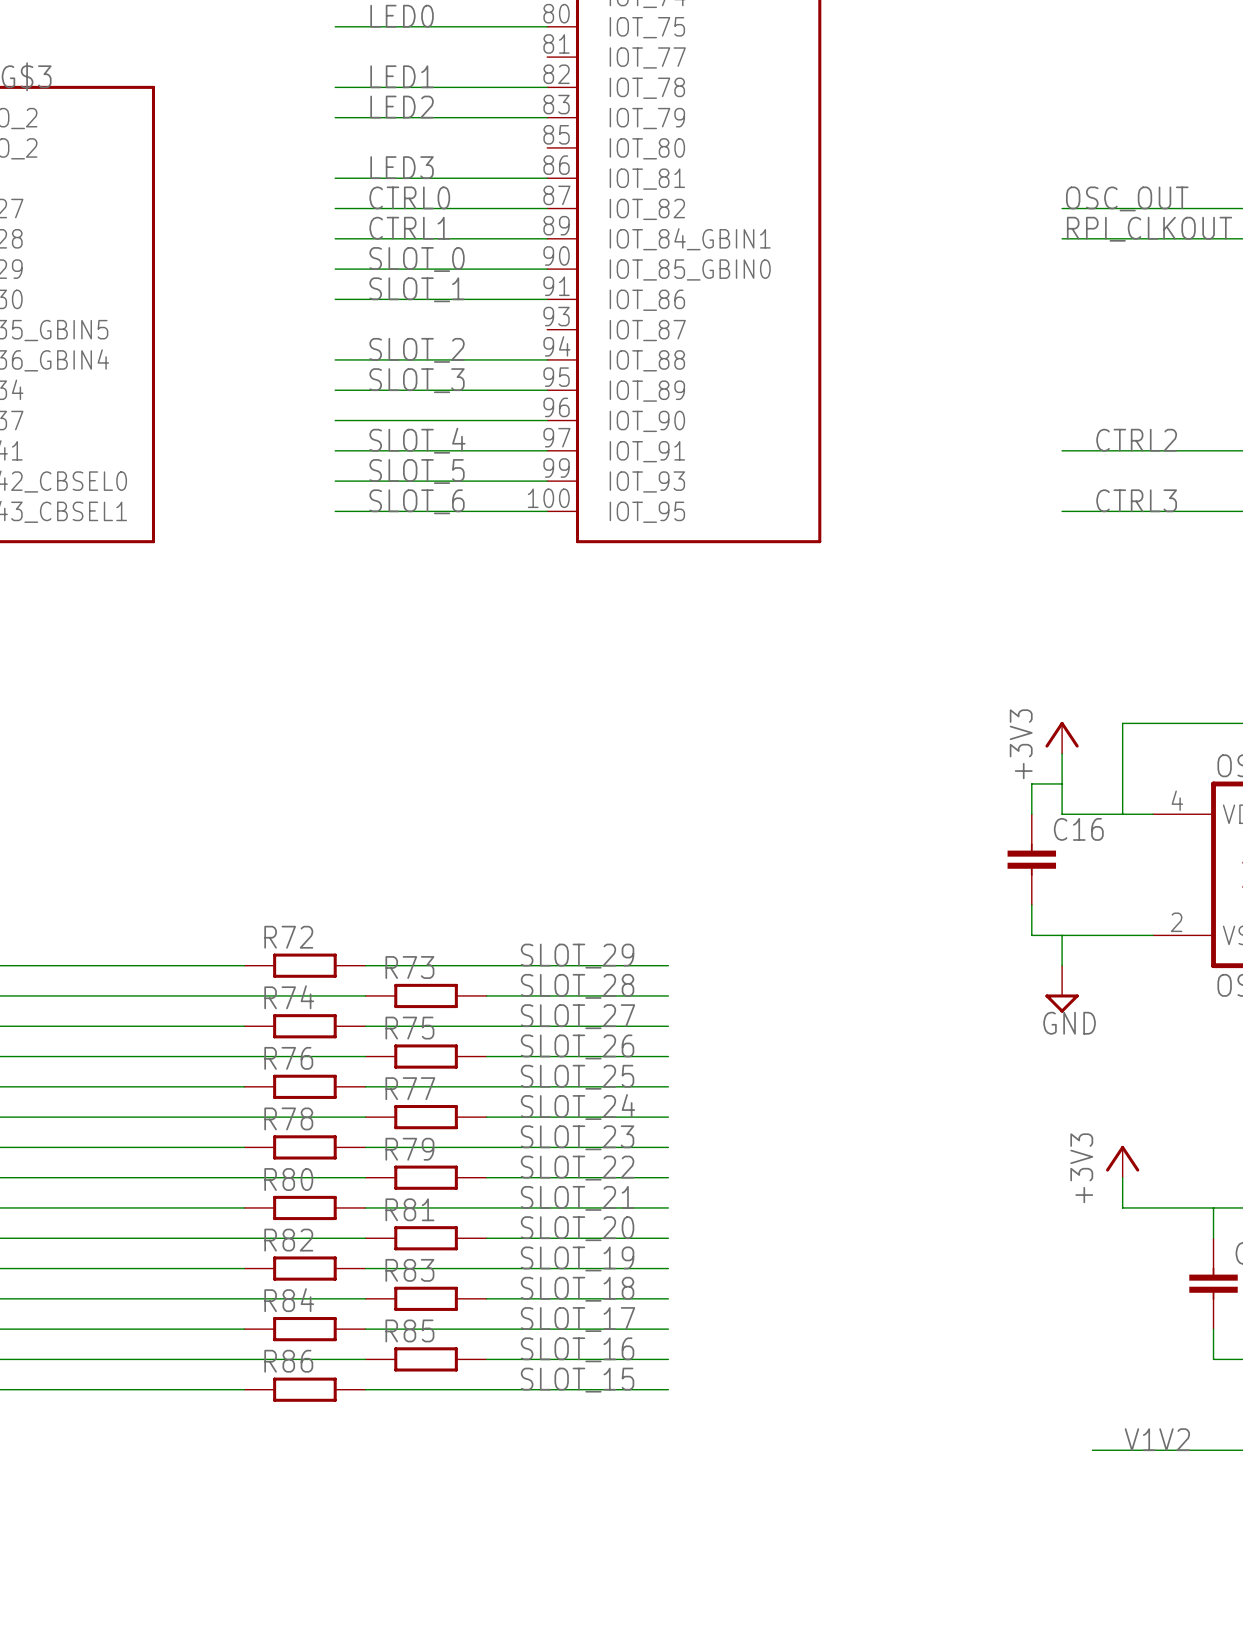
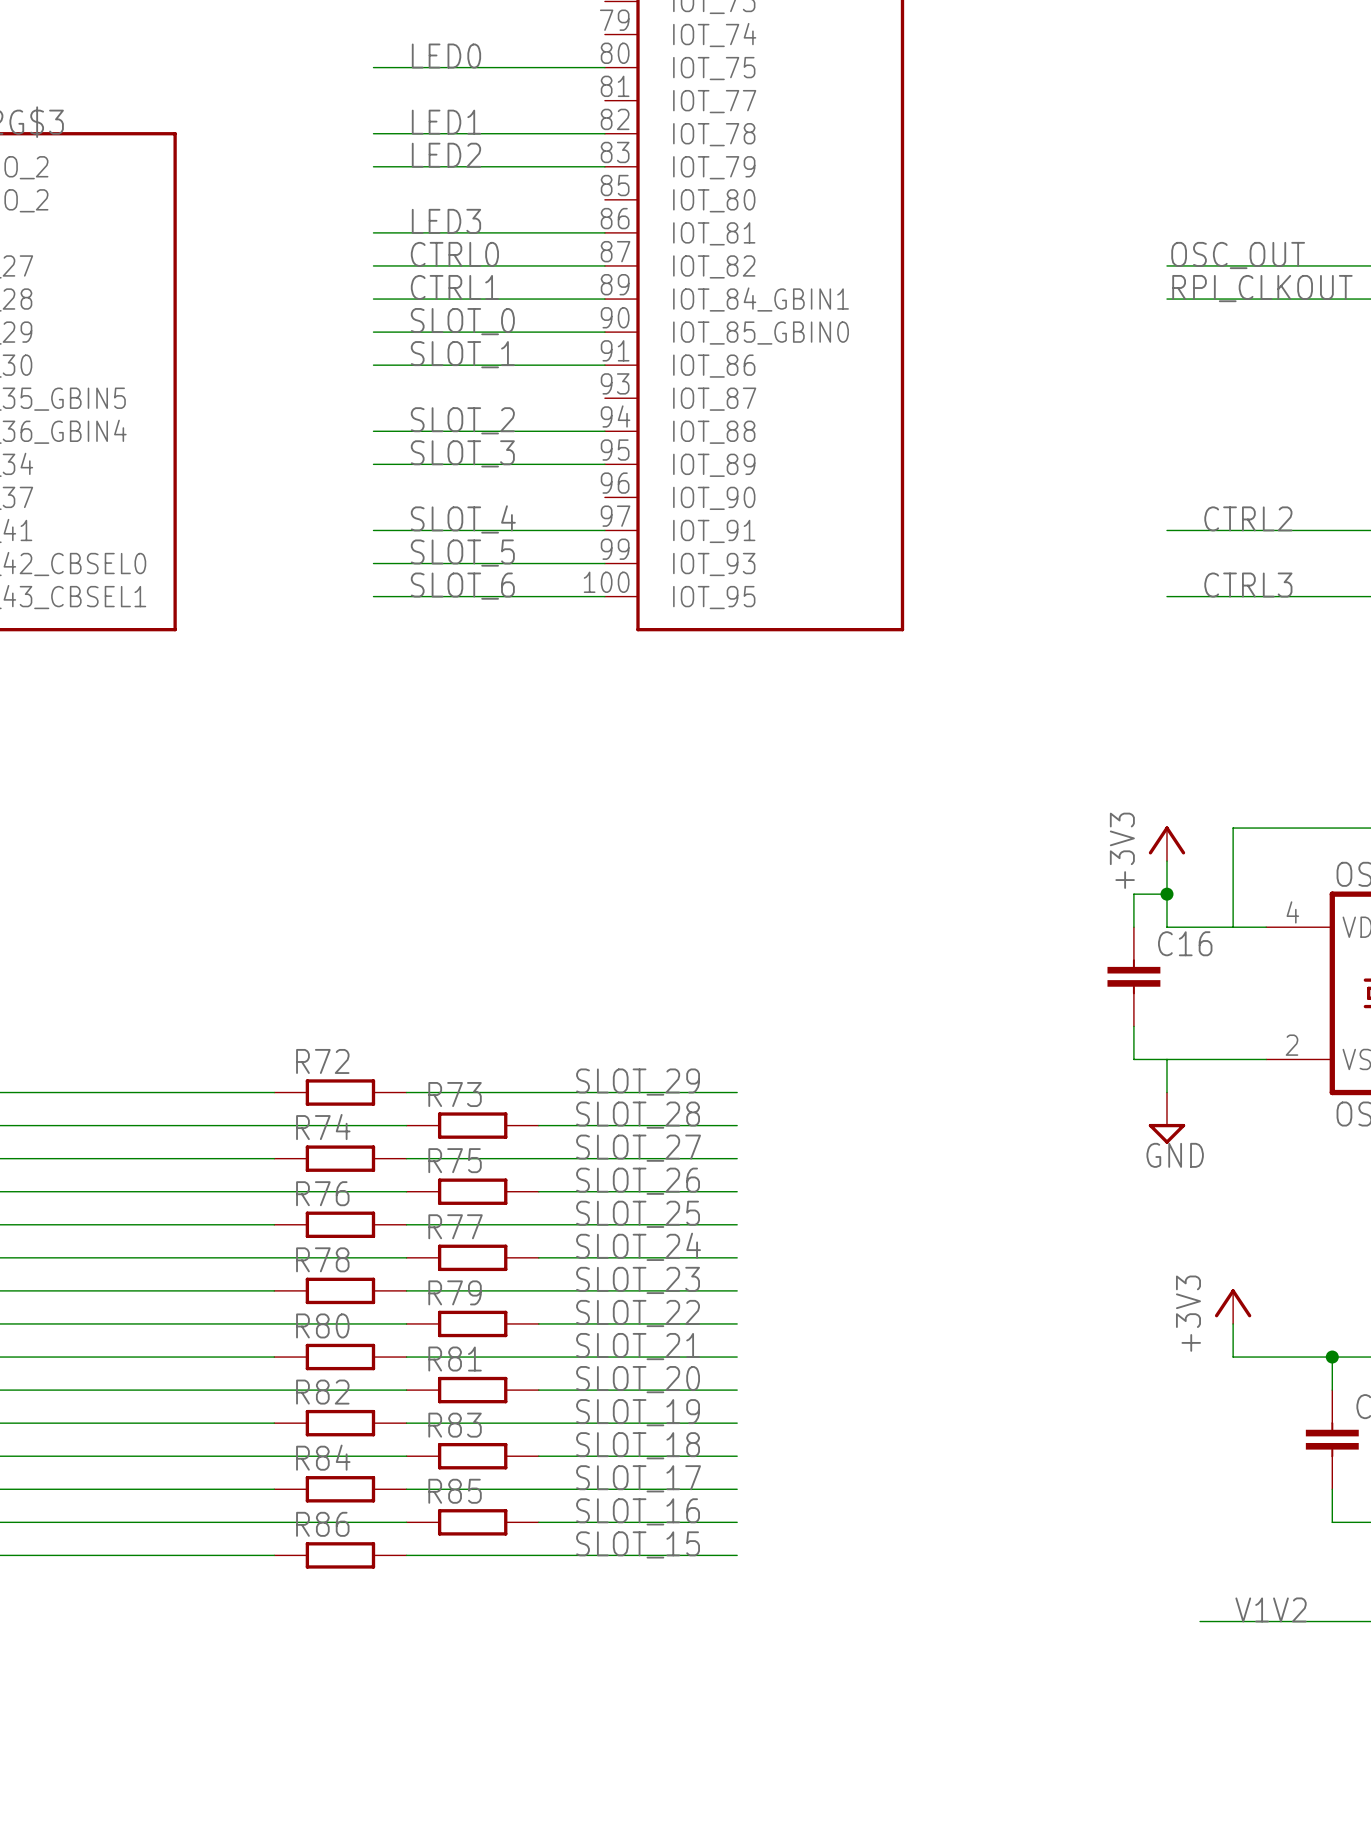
wire: (335, 420) (547, 420) -> none
junction: none -> (1166, 894)
junction: none -> (1332, 1357)

